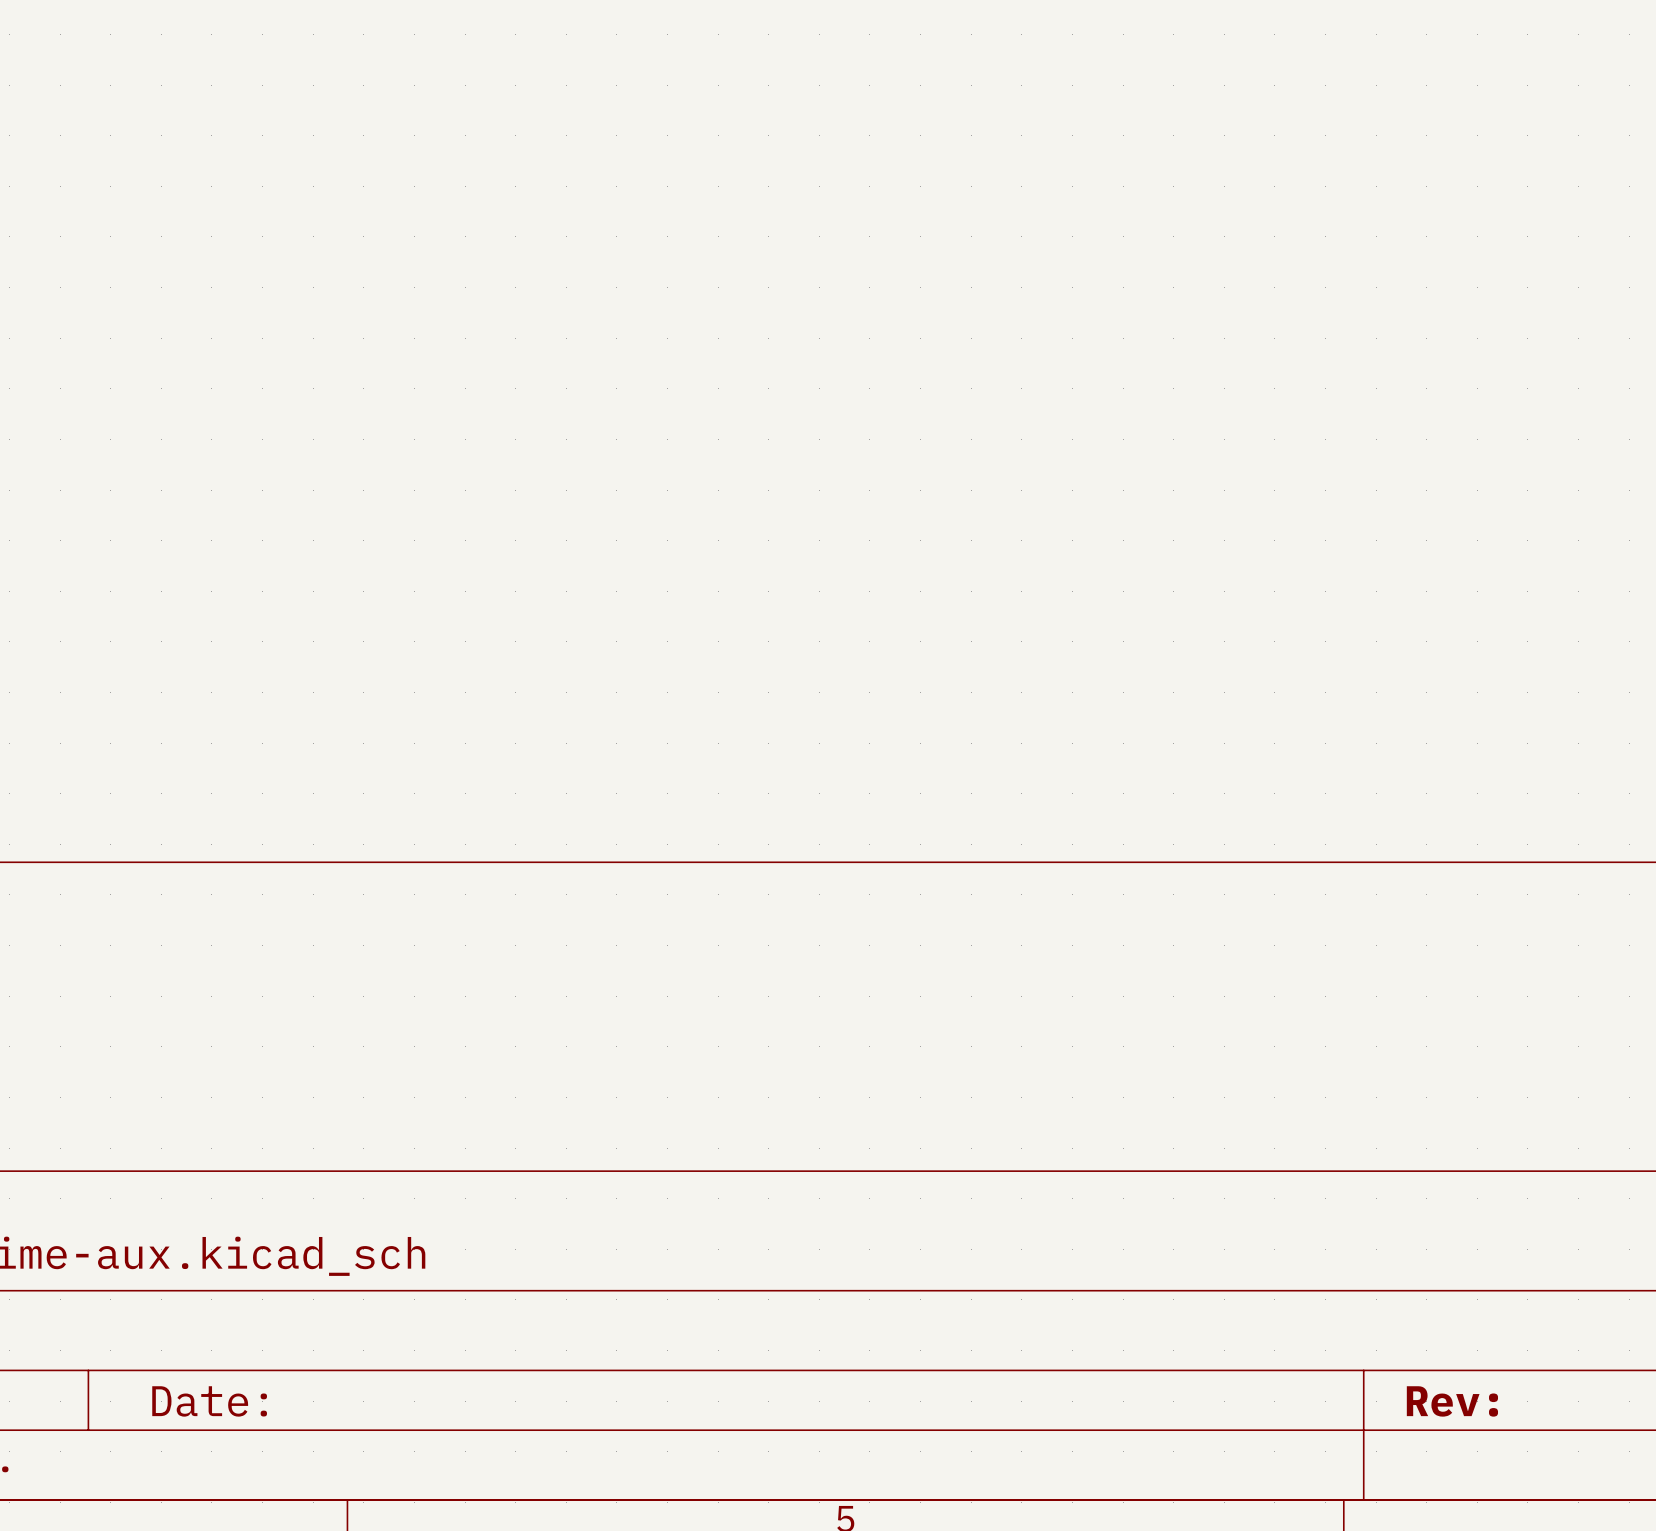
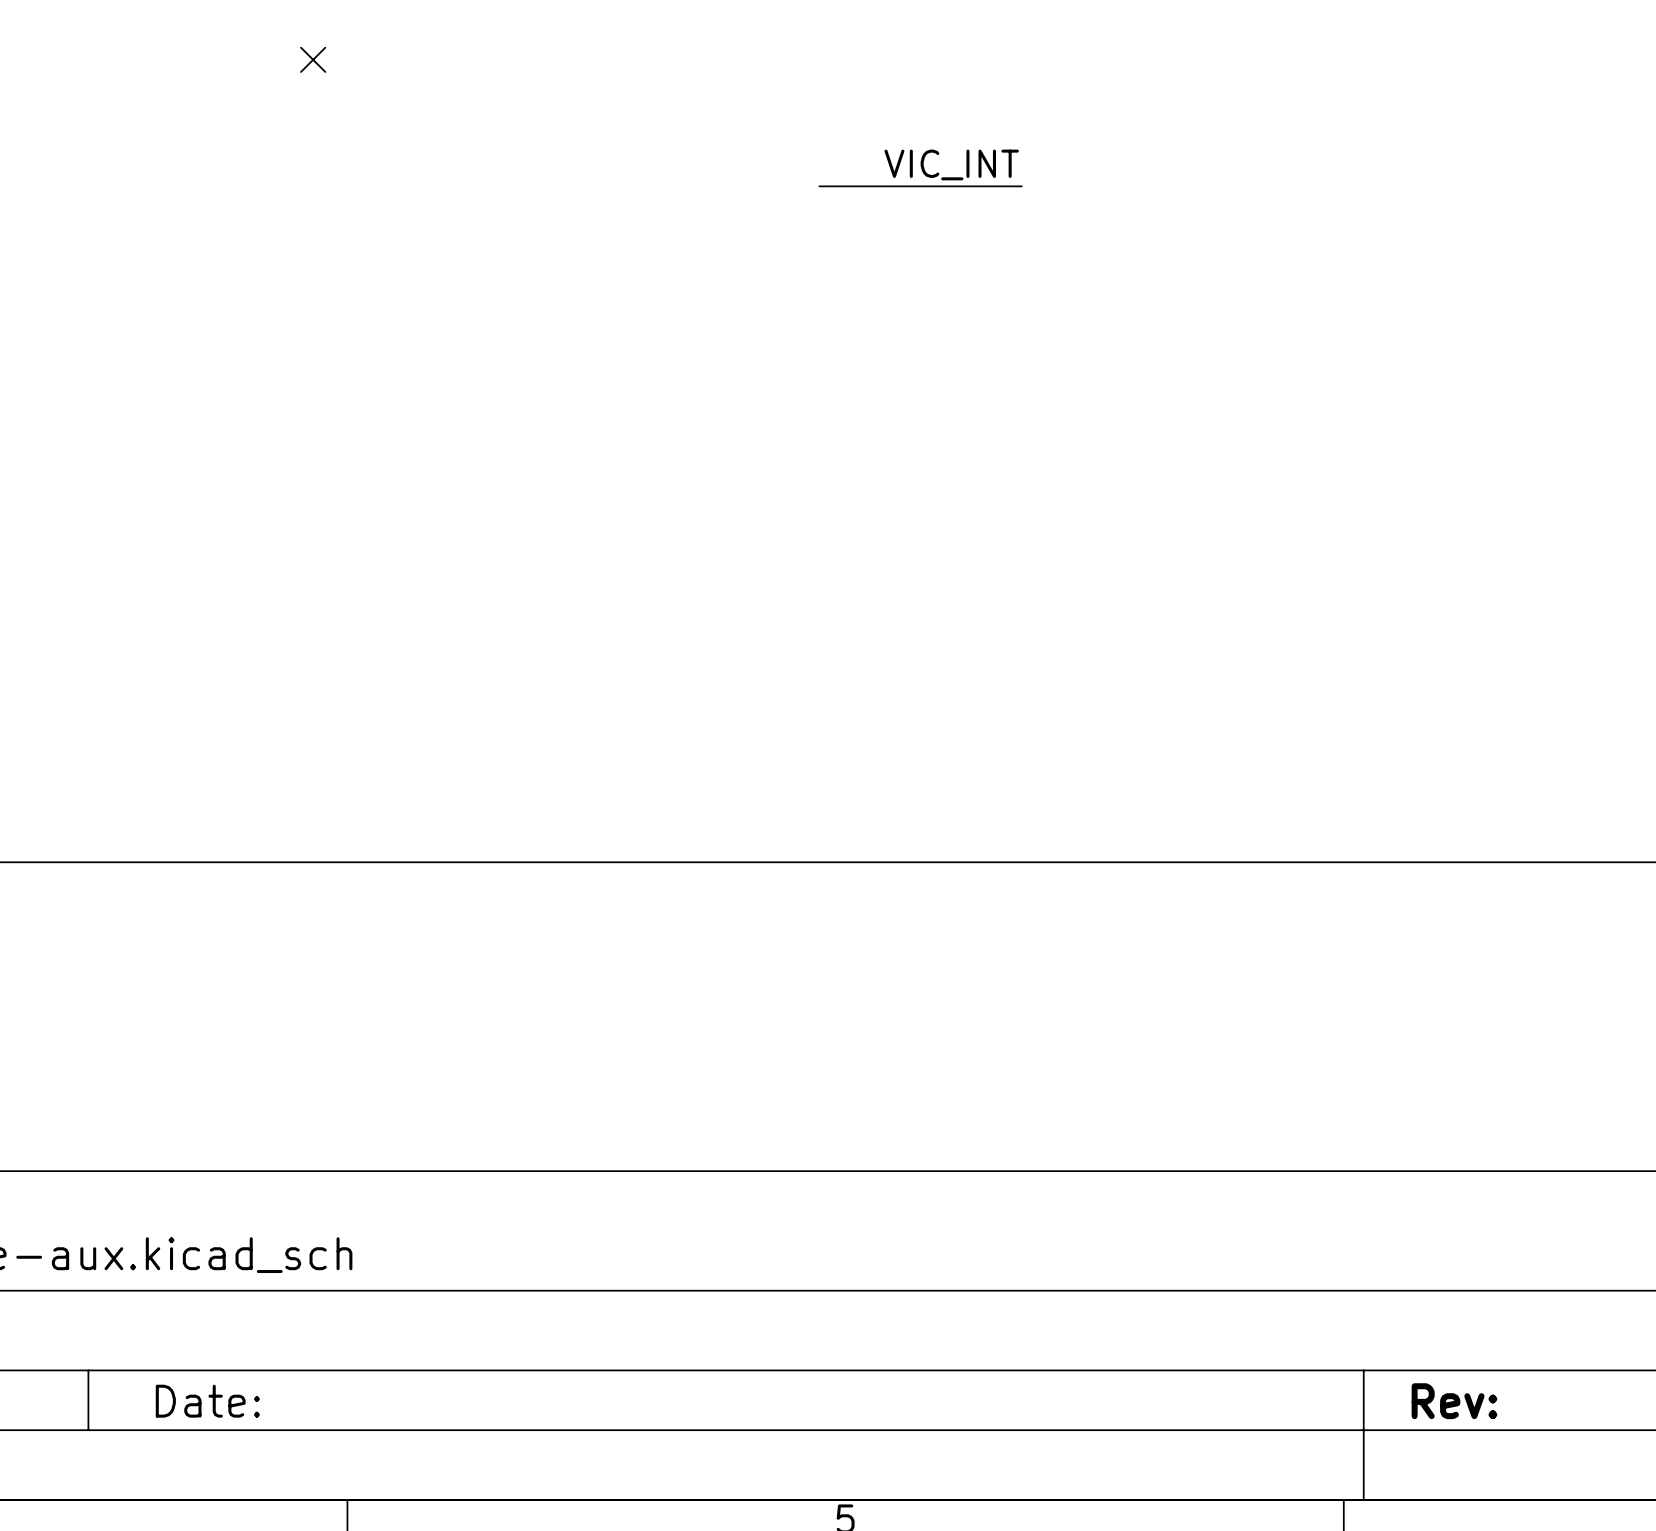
no-connect mark: none -> (313, 59)
label: none -> VIC_INT (951, 164)
wire: none -> (819, 186) (1021, 186)

